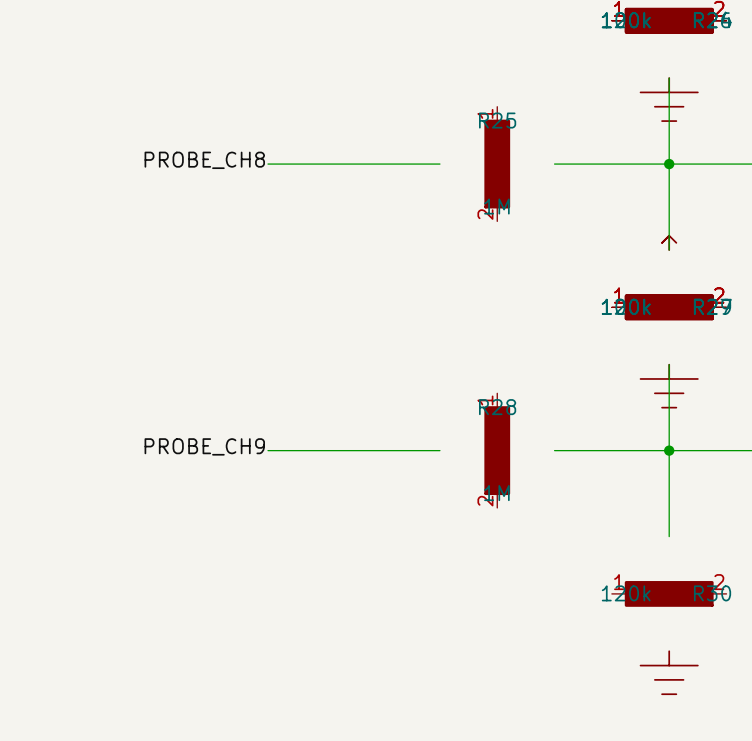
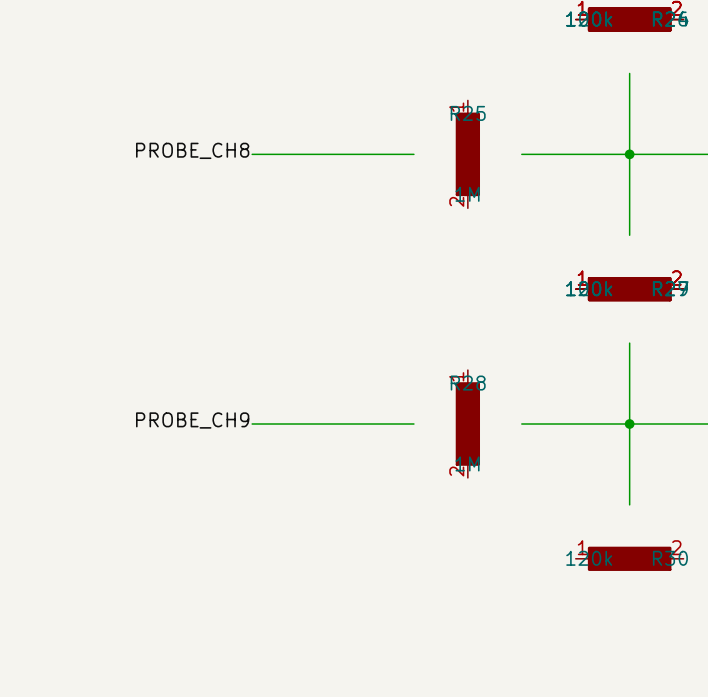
power symbol: (669, 99) -> none
power symbol: (669, 242) -> none
power symbol: (669, 386) -> none
power symbol: (669, 672) -> none

